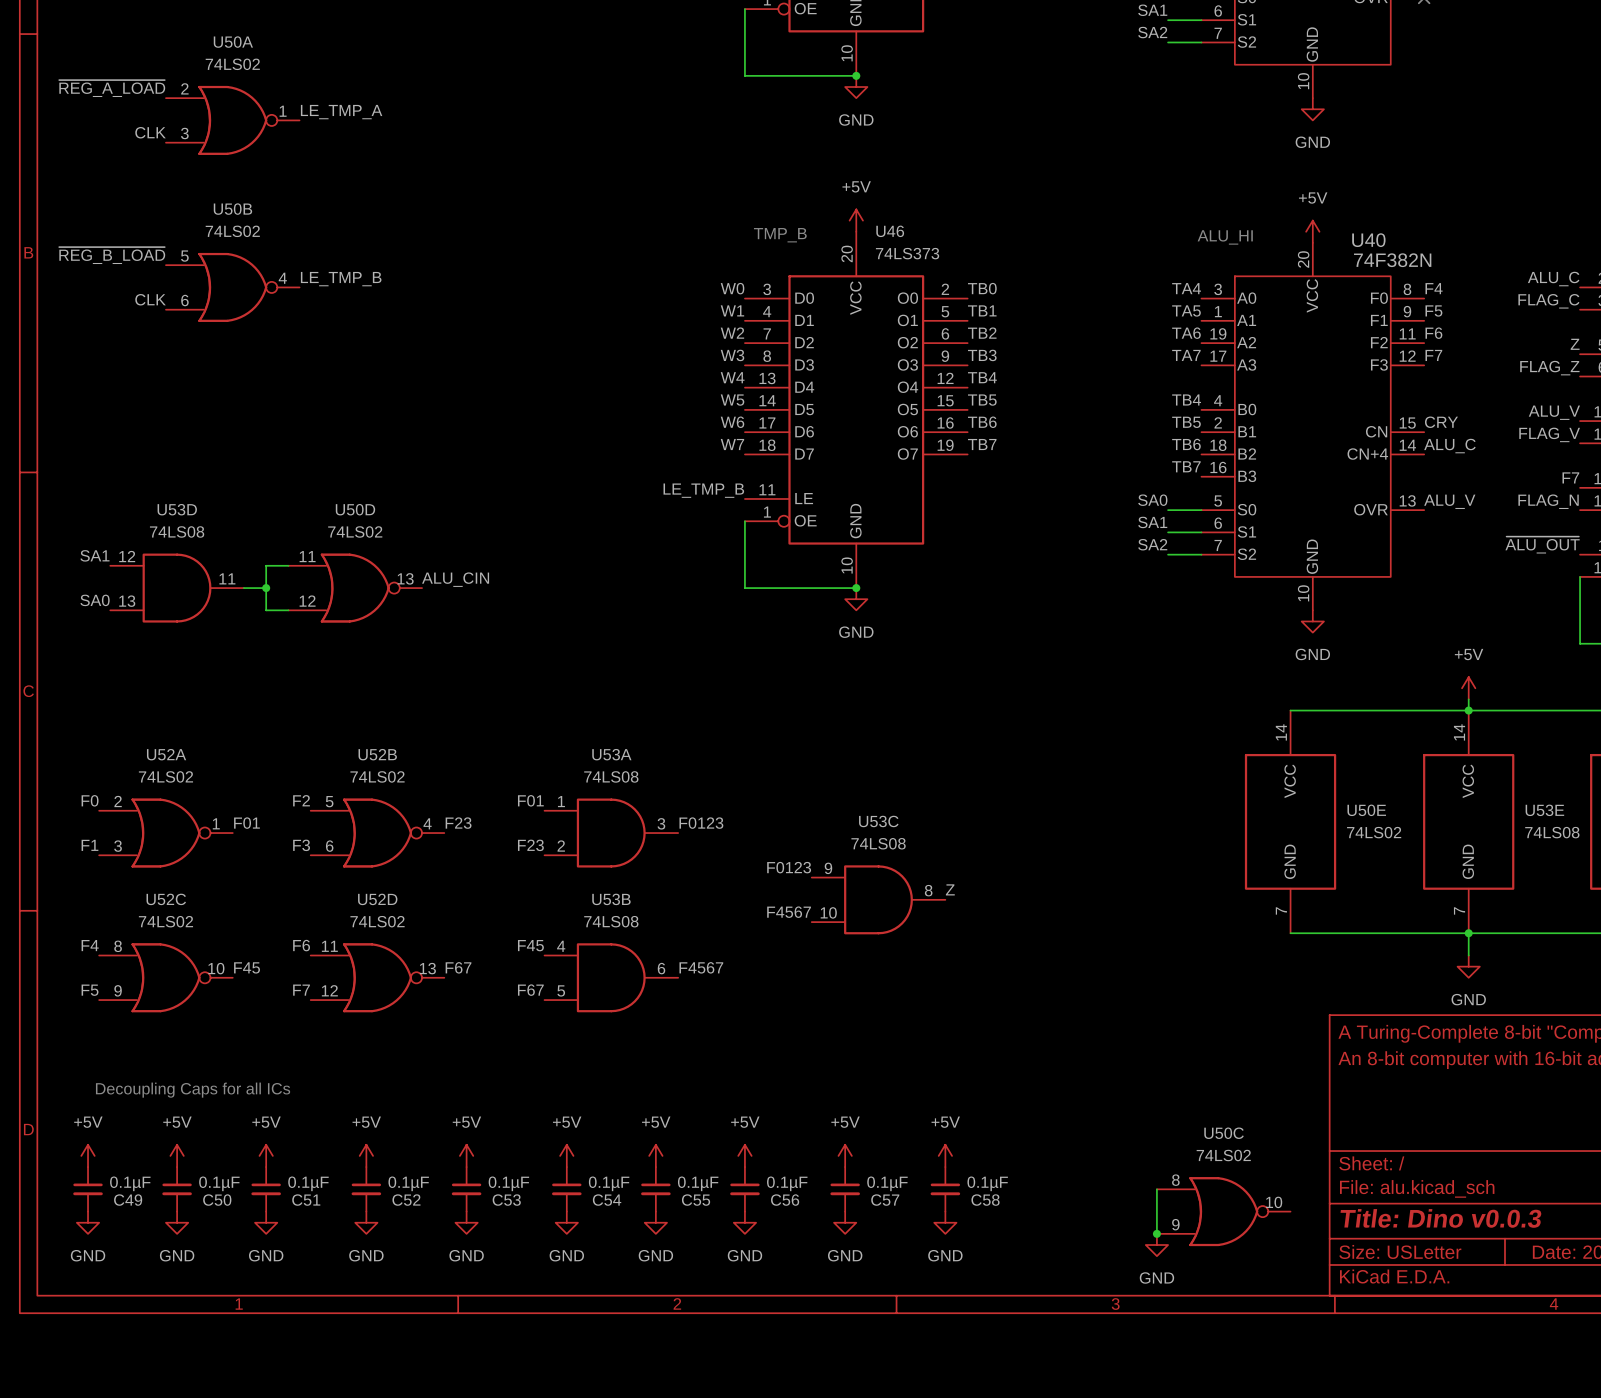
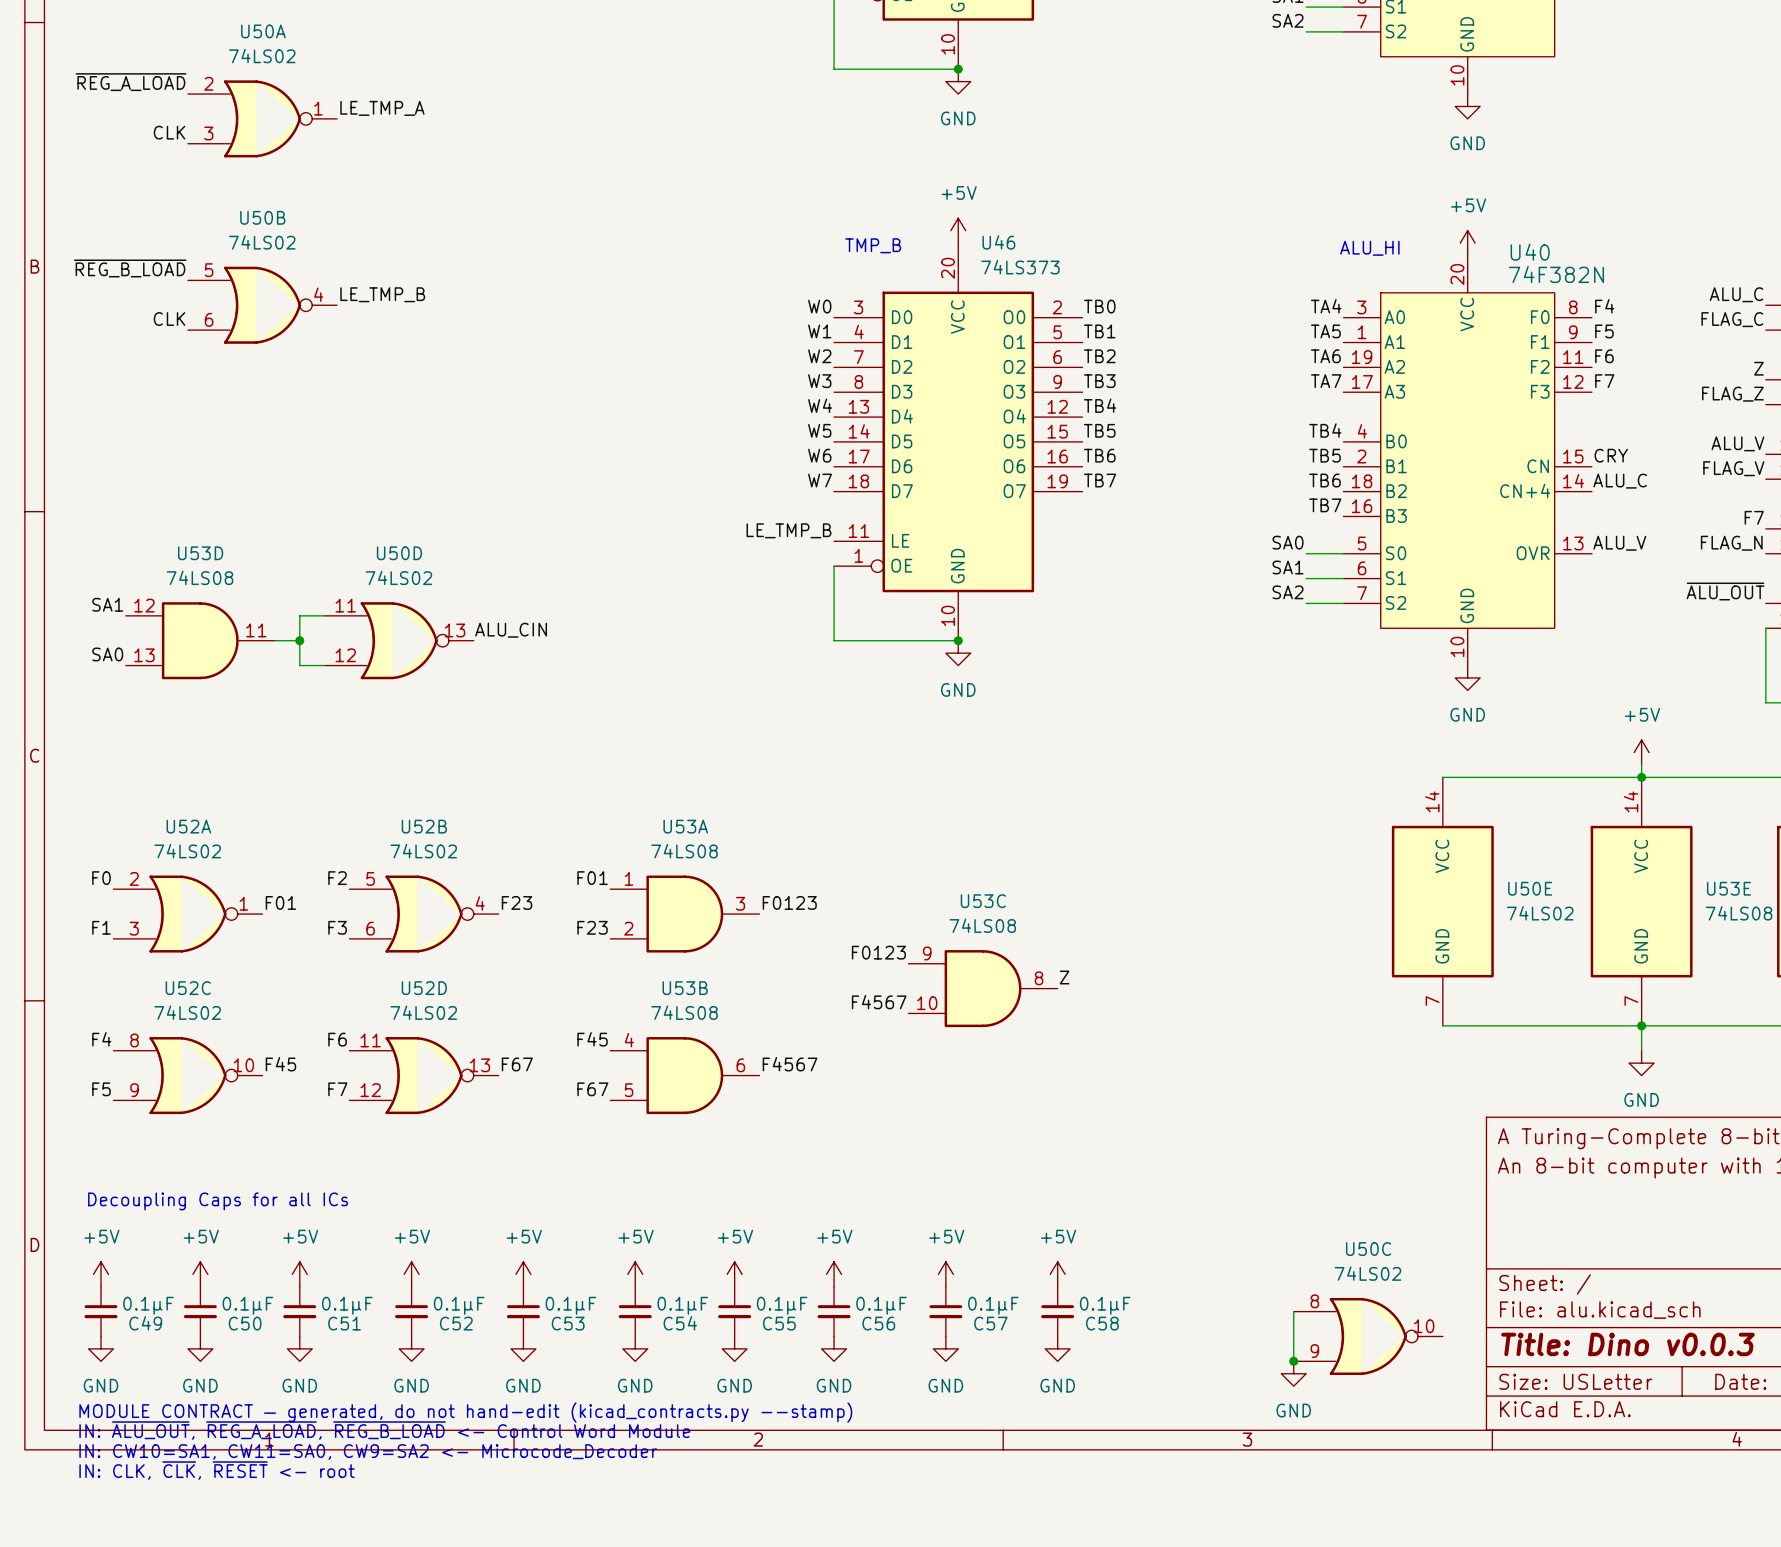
text: none -> MODULE CONTRACT — generated, do not hand-edit (kicad_contracts.py --stamp) (465, 1412)
text: none -> IN: ~{ALU_OUT}, ~{REG_A_LOAD}, ~{REG_B_LOAD} <- Control Word Module (384, 1430)
text: none -> IN: CW10=SA1, CW11=SA0, CW9=SA2 <- Microcode_Decoder (368, 1451)
text: none -> IN: CLK, ~{CLK}, ~{RESET} <- root (217, 1470)

